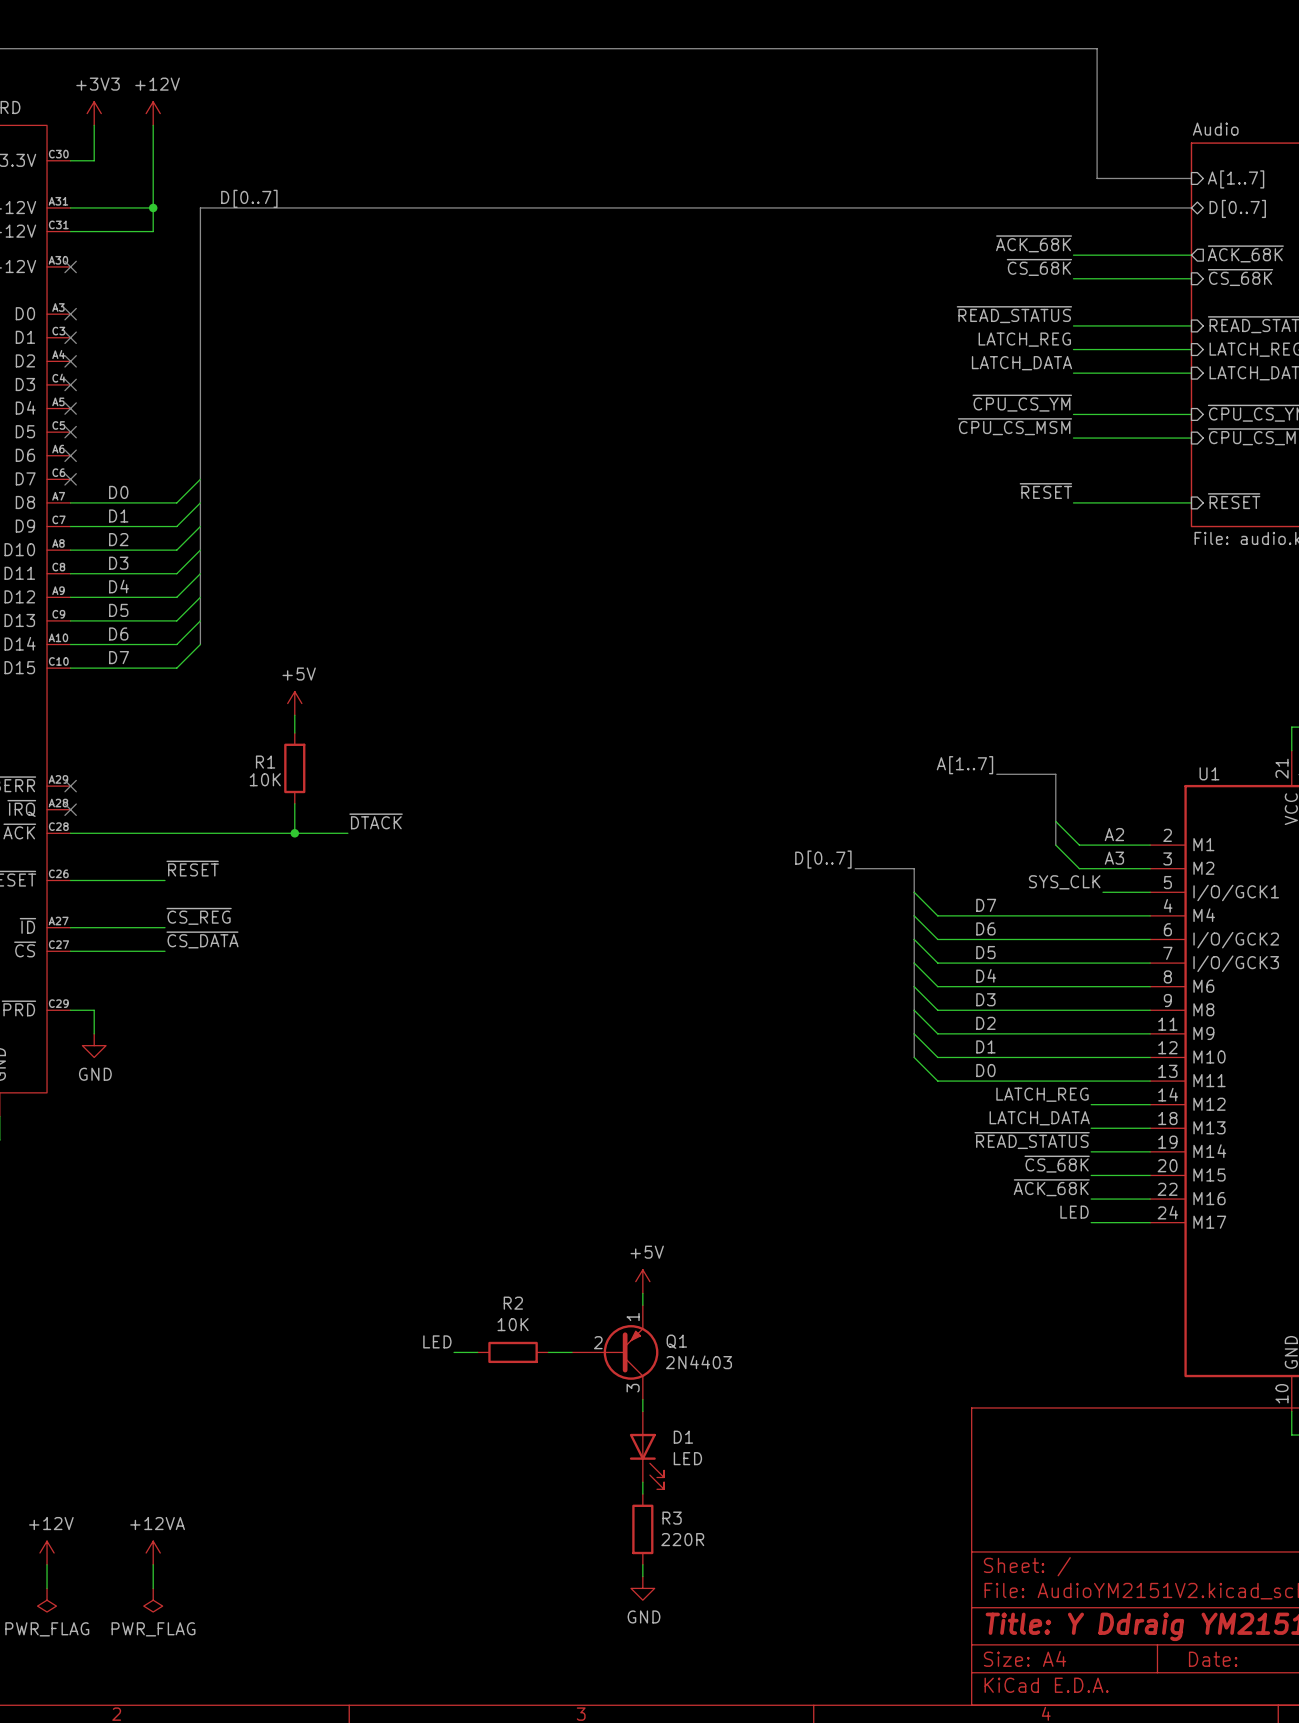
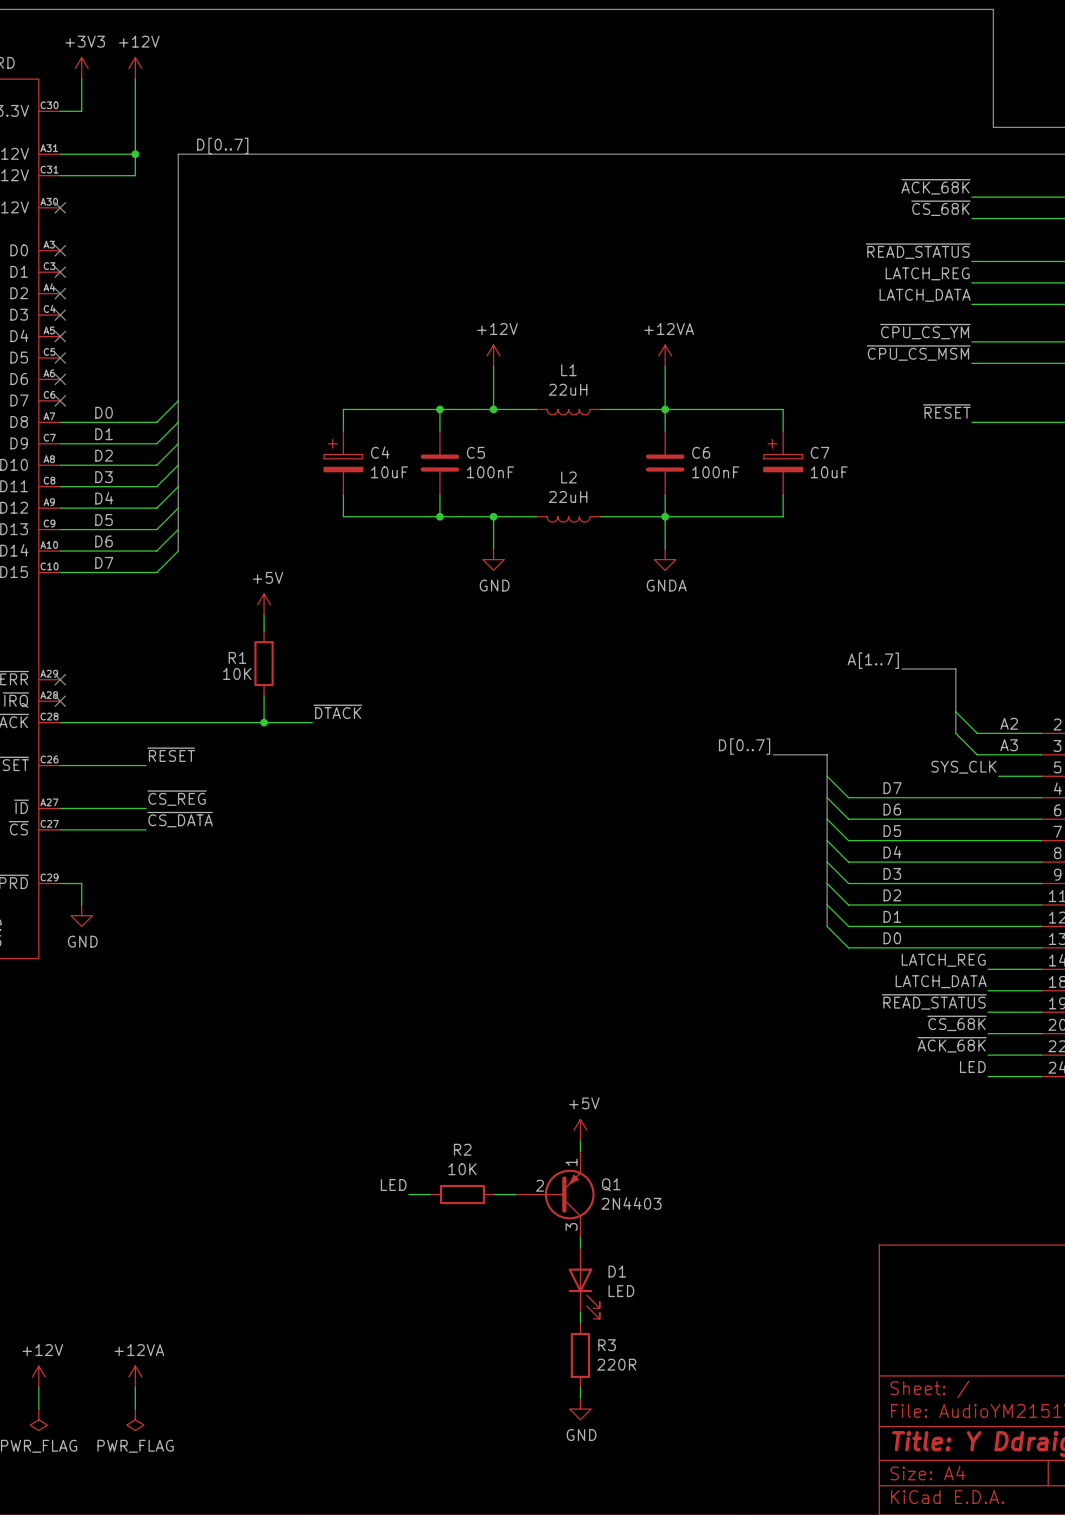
power symbol: none -> +12V (493, 355)
power symbol: none -> +12VA (665, 355)
wire: none -> (493, 366) (493, 409)
wire: none -> (665, 366) (665, 430)
wire: none -> (439, 409) (439, 430)
junction: none -> (439, 409)
junction: none -> (493, 409)
wire: none -> (536, 409) (343, 409) (343, 430)
wire: none -> (600, 409) (783, 409) (783, 430)
junction: none -> (665, 409)
L1: none -> 22uH (568, 412)
C4: none -> 10uF (343, 463)
C5: none -> 100nF (439, 463)
C6: none -> 100nF (665, 463)
C7: none -> 10uF (783, 463)
wire: none -> (343, 495) (343, 516) (536, 516)
wire: none -> (439, 495) (439, 516)
wire: none -> (665, 495) (665, 548)
wire: none -> (783, 495) (783, 516) (600, 516)
junction: none -> (439, 516)
wire: none -> (493, 516) (493, 548)
junction: none -> (493, 516)
junction: none -> (665, 516)
L2: none -> 22uH (568, 519)
power symbol: none -> GND (493, 559)
power symbol: none -> GNDA (665, 559)

